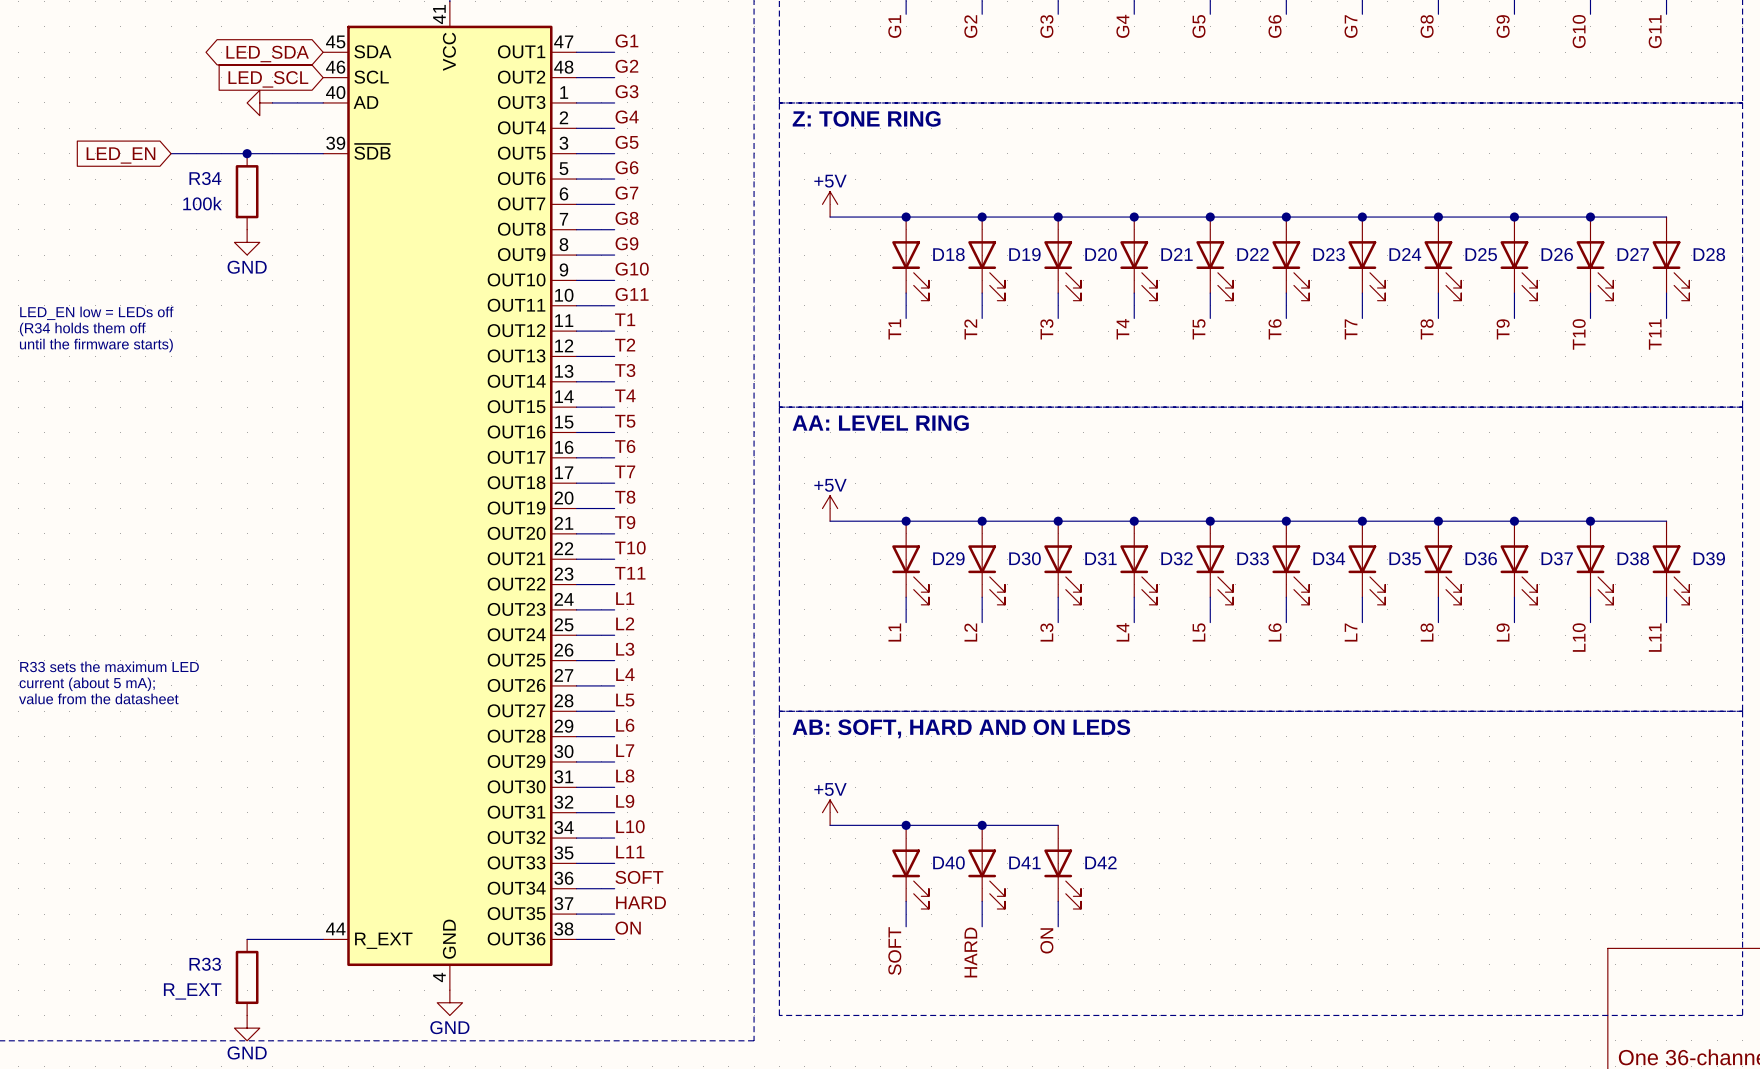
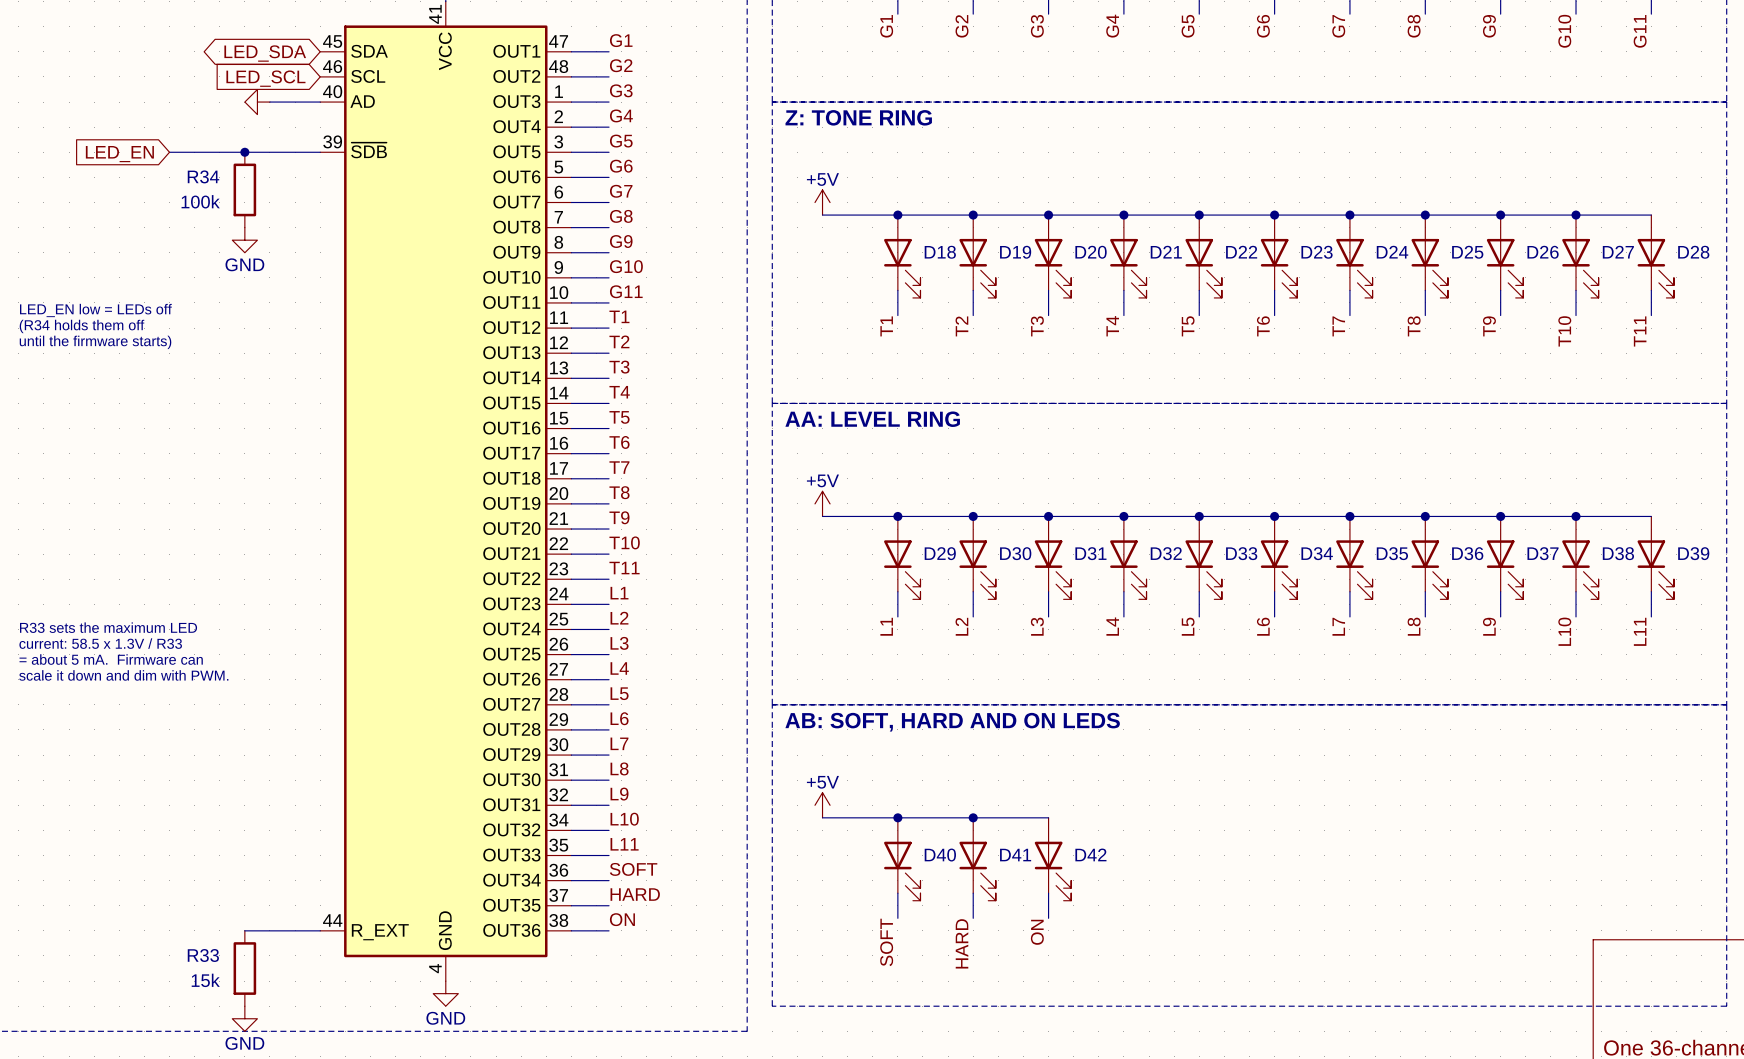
text: none -> R33 sets the maximum LED (108, 627)
text: none -> current: 58.5 x 1.3V / R33 (100, 643)
text: R33 sets the maximum LED (109, 666) -> = about 5 mA. Firmware can (111, 659)
text: current (about 5 mA); (87, 684) -> scale it down and dim with PWM. (123, 675)
text: value from the datasheet (98, 698) -> none
R33 value: R_EXT (192, 991) -> 15k (205, 980)

